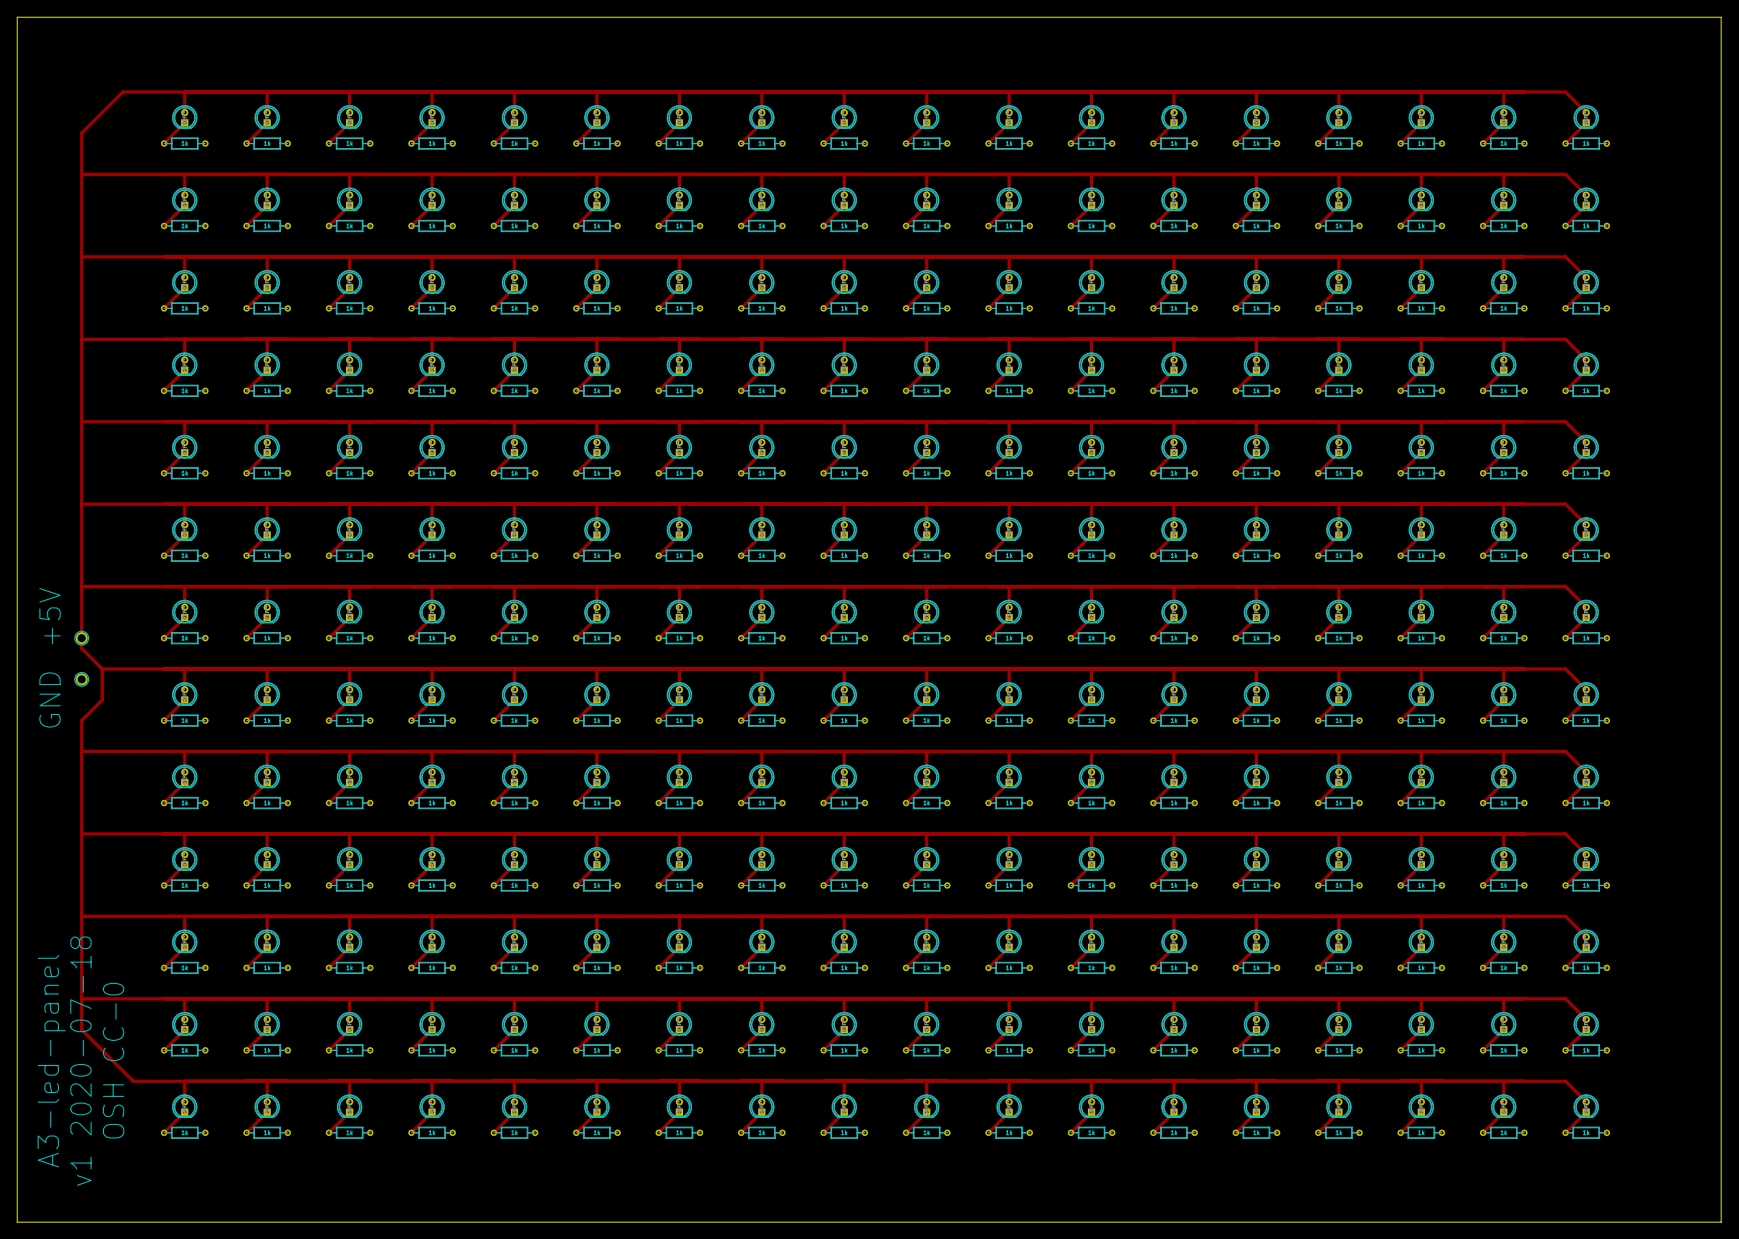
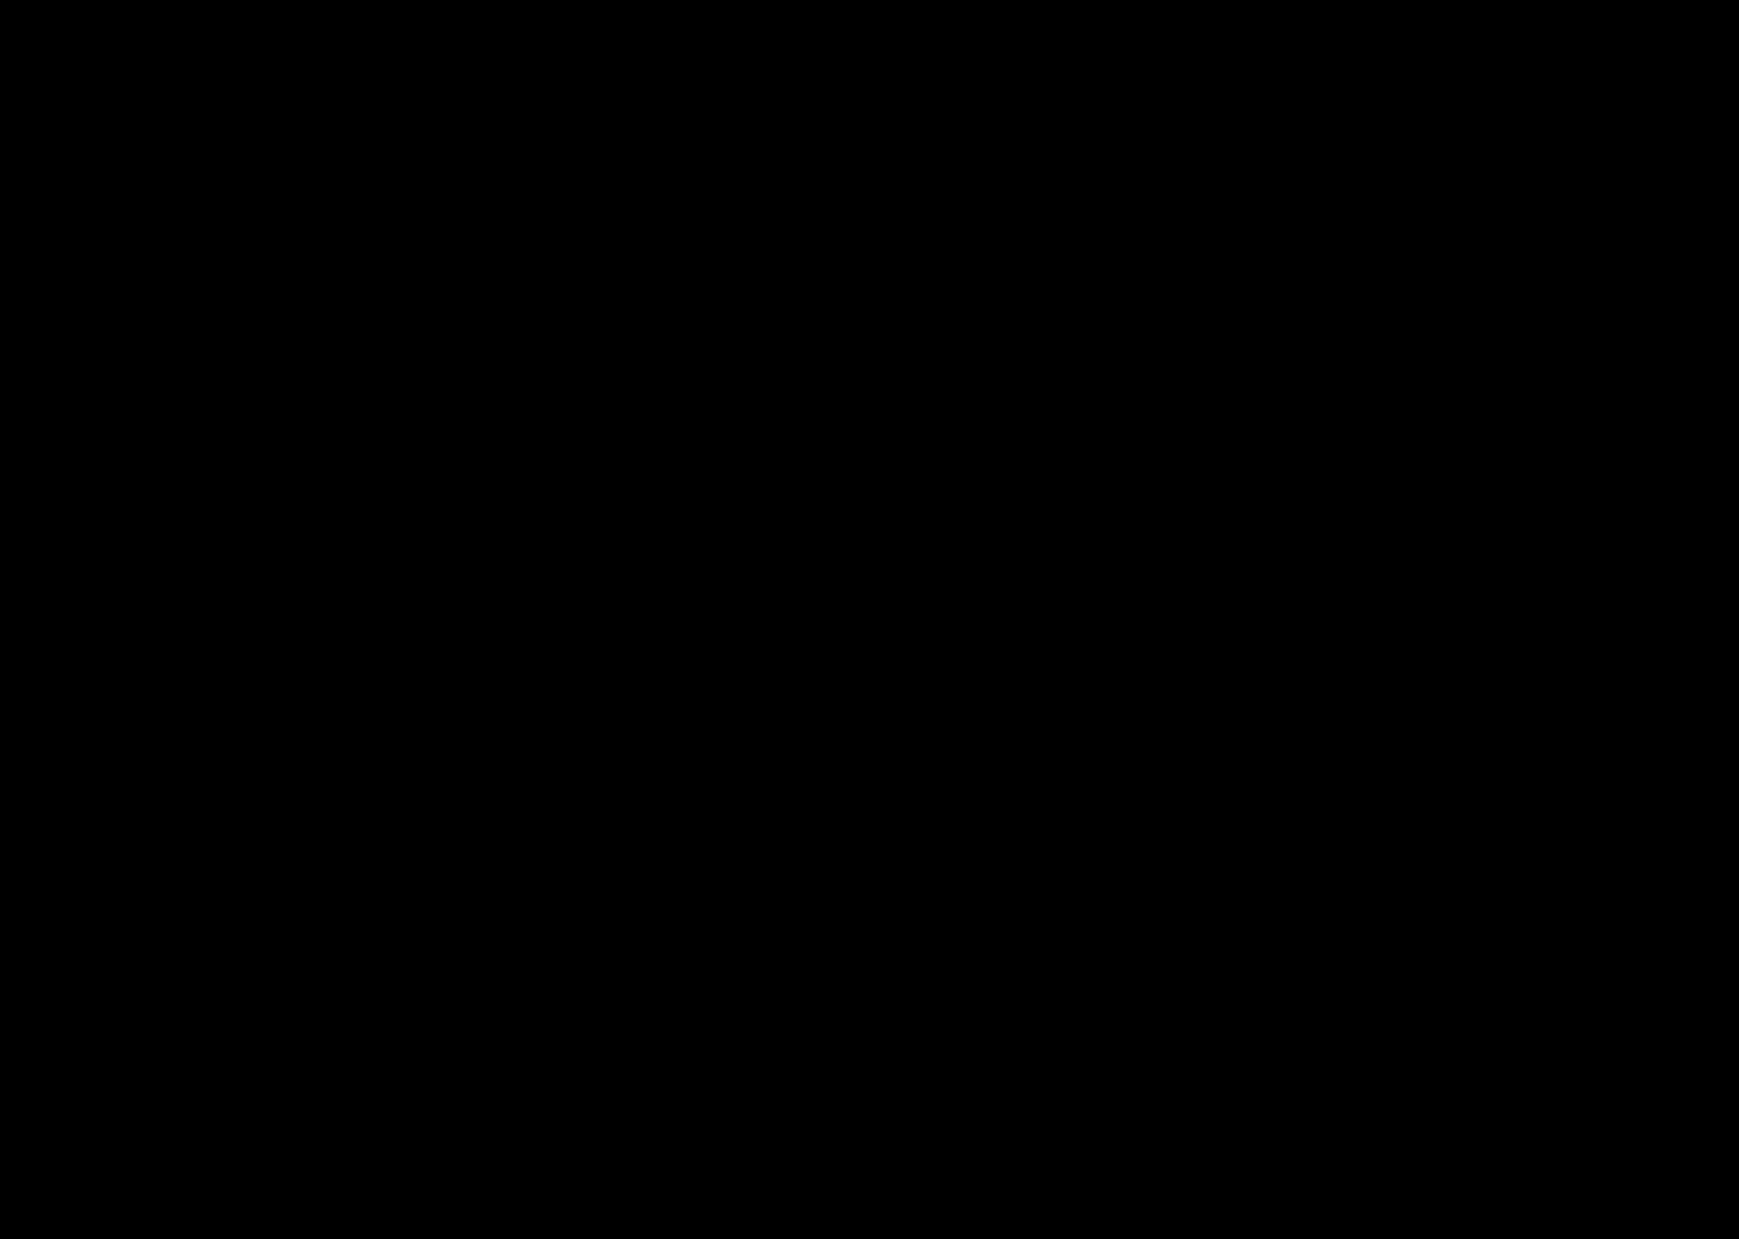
board edge: (17, 17) (17, 1222) (1721, 1222) (1721, 17) (17, 17) -> none
track: (184, 92) (184, 112) -> none
track: (267, 92) (267, 112) -> none
track: (349, 92) (349, 112) -> none
track: (432, 92) (432, 112) -> none
track: (514, 92) (514, 112) -> none
track: (596, 92) (596, 112) -> none
track: (679, 92) (679, 112) -> none
track: (761, 92) (761, 112) -> none
track: (844, 92) (844, 112) -> none
track: (926, 92) (926, 112) -> none
track: (1009, 92) (1009, 112) -> none
track: (1091, 92) (1091, 112) -> none
track: (1174, 92) (1174, 112) -> none
track: (1256, 92) (1256, 112) -> none
track: (1338, 92) (1338, 112) -> none
track: (1421, 92) (1421, 112) -> none
track: (1503, 92) (1503, 112) -> none
track: (1586, 112) (1565, 92) (122, 92) (81, 133) (81, 648) (102, 669) -> none
part: (184, 116) -> none
part: (267, 116) -> none
part: (349, 116) -> none
part: (432, 116) -> none
part: (514, 116) -> none
part: (596, 116) -> none
part: (679, 116) -> none
part: (761, 116) -> none
part: (844, 116) -> none
part: (926, 116) -> none
part: (1009, 116) -> none
part: (1091, 116) -> none
part: (1174, 116) -> none
part: (1256, 116) -> none
part: (1338, 116) -> none
part: (1421, 116) -> none
part: (1503, 116) -> none
part: (1586, 116) -> none
track: (184, 122) (164, 143) -> none
track: (267, 122) (246, 143) -> none
track: (349, 122) (329, 143) -> none
track: (432, 122) (411, 143) -> none
track: (514, 122) (493, 143) -> none
track: (596, 122) (576, 143) -> none
track: (679, 122) (658, 143) -> none
track: (761, 122) (741, 143) -> none
track: (844, 122) (823, 143) -> none
track: (926, 122) (906, 143) -> none
track: (1009, 122) (988, 143) -> none
track: (1091, 122) (1070, 143) -> none
track: (1174, 122) (1153, 143) -> none
track: (1256, 122) (1235, 143) -> none
track: (1338, 122) (1318, 143) -> none
track: (1421, 122) (1400, 143) -> none
track: (1503, 122) (1483, 143) -> none
track: (1586, 122) (1565, 143) -> none
part: (184, 143) -> none
part: (267, 143) -> none
part: (349, 143) -> none
part: (432, 143) -> none
part: (514, 143) -> none
part: (596, 143) -> none
part: (679, 143) -> none
part: (761, 143) -> none
part: (844, 143) -> none
part: (926, 143) -> none
part: (1009, 143) -> none
part: (1091, 143) -> none
part: (1174, 143) -> none
part: (1256, 143) -> none
part: (1338, 143) -> none
part: (1421, 143) -> none
part: (1503, 143) -> none
part: (1586, 143) -> none
track: (81, 174) (1565, 174) (1586, 195) -> none
track: (184, 174) (184, 195) -> none
track: (267, 174) (267, 195) -> none
track: (349, 174) (349, 195) -> none
track: (432, 174) (432, 195) -> none
track: (514, 174) (514, 195) -> none
track: (596, 174) (596, 195) -> none
track: (679, 174) (679, 195) -> none
track: (761, 174) (761, 195) -> none
track: (844, 174) (844, 195) -> none
track: (926, 174) (926, 195) -> none
track: (1009, 174) (1009, 195) -> none
track: (1091, 174) (1091, 195) -> none
track: (1174, 174) (1174, 195) -> none
track: (1256, 174) (1256, 195) -> none
track: (1338, 174) (1338, 195) -> none
track: (1421, 174) (1421, 195) -> none
track: (1503, 174) (1503, 195) -> none
part: (184, 199) -> none
part: (267, 199) -> none
part: (349, 199) -> none
part: (432, 199) -> none
part: (514, 199) -> none
part: (596, 199) -> none
part: (679, 199) -> none
part: (761, 199) -> none
part: (844, 199) -> none
part: (926, 199) -> none
part: (1009, 199) -> none
part: (1091, 199) -> none
part: (1174, 199) -> none
part: (1256, 199) -> none
part: (1338, 199) -> none
part: (1421, 199) -> none
part: (1503, 199) -> none
part: (1586, 199) -> none
track: (184, 205) (164, 225) -> none
track: (267, 205) (246, 225) -> none
track: (349, 205) (329, 225) -> none
track: (432, 205) (411, 225) -> none
track: (514, 205) (493, 225) -> none
track: (596, 205) (576, 225) -> none
track: (679, 205) (658, 225) -> none
track: (761, 205) (741, 225) -> none
track: (844, 205) (823, 225) -> none
track: (926, 205) (906, 225) -> none
track: (1009, 205) (988, 225) -> none
track: (1091, 205) (1070, 225) -> none
track: (1174, 205) (1153, 225) -> none
track: (1256, 205) (1235, 225) -> none
track: (1338, 205) (1318, 225) -> none
track: (1421, 205) (1400, 225) -> none
track: (1503, 205) (1483, 225) -> none
track: (1586, 205) (1565, 225) -> none
part: (184, 225) -> none
part: (267, 225) -> none
part: (349, 225) -> none
part: (432, 225) -> none
part: (514, 225) -> none
part: (596, 225) -> none
part: (679, 225) -> none
part: (761, 225) -> none
part: (844, 225) -> none
part: (926, 225) -> none
part: (1009, 225) -> none
part: (1091, 225) -> none
part: (1174, 225) -> none
part: (1256, 225) -> none
part: (1338, 225) -> none
part: (1421, 225) -> none
part: (1503, 225) -> none
part: (1586, 225) -> none
track: (81, 256) (1565, 256) (1586, 277) -> none
track: (184, 256) (184, 277) -> none
track: (267, 256) (267, 277) -> none
track: (349, 256) (349, 277) -> none
track: (432, 256) (432, 277) -> none
track: (514, 256) (514, 277) -> none
track: (596, 256) (596, 277) -> none
track: (679, 256) (679, 277) -> none
track: (761, 256) (761, 277) -> none
track: (844, 256) (844, 277) -> none
track: (926, 256) (926, 277) -> none
track: (1009, 256) (1009, 277) -> none
track: (1091, 256) (1091, 277) -> none
track: (1174, 256) (1174, 277) -> none
track: (1256, 256) (1256, 277) -> none
track: (1338, 256) (1338, 277) -> none
track: (1421, 256) (1421, 277) -> none
track: (1503, 256) (1503, 277) -> none
part: (184, 281) -> none
part: (267, 281) -> none
part: (349, 281) -> none
part: (432, 281) -> none
part: (514, 281) -> none
part: (596, 281) -> none
part: (679, 281) -> none
part: (761, 281) -> none
part: (844, 281) -> none
part: (926, 281) -> none
part: (1009, 281) -> none
part: (1091, 281) -> none
part: (1174, 281) -> none
part: (1256, 281) -> none
part: (1338, 281) -> none
part: (1421, 281) -> none
part: (1503, 281) -> none
part: (1586, 281) -> none
track: (184, 287) (164, 308) -> none
track: (267, 287) (246, 308) -> none
track: (349, 287) (329, 308) -> none
track: (432, 287) (411, 308) -> none
track: (514, 287) (493, 308) -> none
track: (596, 287) (576, 308) -> none
track: (679, 287) (658, 308) -> none
track: (761, 287) (741, 308) -> none
track: (844, 287) (823, 308) -> none
track: (926, 287) (906, 308) -> none
track: (1009, 287) (988, 308) -> none
track: (1091, 287) (1070, 308) -> none
track: (1174, 287) (1153, 308) -> none
track: (1256, 287) (1235, 308) -> none
track: (1338, 287) (1318, 308) -> none
track: (1421, 287) (1400, 308) -> none
track: (1503, 287) (1483, 308) -> none
track: (1586, 287) (1565, 308) -> none
part: (184, 308) -> none
part: (267, 308) -> none
part: (349, 308) -> none
part: (432, 308) -> none
part: (514, 308) -> none
part: (596, 308) -> none
part: (679, 308) -> none
part: (761, 308) -> none
part: (844, 308) -> none
part: (926, 308) -> none
part: (1009, 308) -> none
part: (1091, 308) -> none
part: (1174, 308) -> none
part: (1256, 308) -> none
part: (1338, 308) -> none
part: (1421, 308) -> none
part: (1503, 308) -> none
part: (1586, 308) -> none
track: (81, 339) (1565, 339) (1586, 359) -> none
track: (184, 339) (184, 359) -> none
track: (267, 339) (267, 359) -> none
track: (349, 339) (349, 359) -> none
track: (432, 339) (432, 359) -> none
track: (514, 339) (514, 359) -> none
track: (596, 339) (596, 359) -> none
track: (679, 339) (679, 359) -> none
track: (761, 339) (761, 359) -> none
track: (844, 339) (844, 359) -> none
track: (926, 339) (926, 359) -> none
track: (1009, 339) (1009, 359) -> none
track: (1091, 339) (1091, 359) -> none
track: (1174, 339) (1174, 359) -> none
track: (1256, 339) (1256, 359) -> none
track: (1338, 339) (1338, 359) -> none
track: (1421, 339) (1421, 359) -> none
track: (1503, 339) (1503, 359) -> none
part: (184, 364) -> none
part: (267, 364) -> none
part: (349, 364) -> none
part: (432, 364) -> none
part: (514, 364) -> none
part: (596, 364) -> none
part: (679, 364) -> none
part: (761, 364) -> none
part: (844, 364) -> none
part: (926, 364) -> none
part: (1009, 364) -> none
part: (1091, 364) -> none
part: (1174, 364) -> none
part: (1256, 364) -> none
part: (1338, 364) -> none
part: (1421, 364) -> none
part: (1503, 364) -> none
part: (1586, 364) -> none
track: (184, 370) (164, 390) -> none
track: (267, 370) (246, 390) -> none
track: (349, 370) (329, 390) -> none
track: (432, 370) (411, 390) -> none
track: (514, 370) (493, 390) -> none
track: (596, 370) (576, 390) -> none
track: (679, 370) (658, 390) -> none
track: (761, 370) (741, 390) -> none
track: (844, 370) (823, 390) -> none
track: (926, 370) (906, 390) -> none
track: (1009, 370) (988, 390) -> none
track: (1091, 370) (1070, 390) -> none
track: (1174, 370) (1153, 390) -> none
track: (1256, 370) (1235, 390) -> none
track: (1338, 370) (1318, 390) -> none
track: (1421, 370) (1400, 390) -> none
track: (1503, 370) (1483, 390) -> none
track: (1586, 370) (1565, 390) -> none
part: (184, 390) -> none
part: (267, 390) -> none
part: (349, 390) -> none
part: (432, 390) -> none
part: (514, 390) -> none
part: (596, 390) -> none
part: (679, 390) -> none
part: (761, 390) -> none
part: (844, 390) -> none
part: (926, 390) -> none
part: (1009, 390) -> none
part: (1091, 390) -> none
part: (1174, 390) -> none
part: (1256, 390) -> none
part: (1338, 390) -> none
part: (1421, 390) -> none
part: (1503, 390) -> none
part: (1586, 390) -> none
track: (81, 421) (1565, 421) (1586, 442) -> none
track: (184, 421) (184, 442) -> none
track: (267, 421) (267, 442) -> none
track: (349, 421) (349, 442) -> none
track: (432, 421) (432, 442) -> none
track: (514, 421) (514, 442) -> none
track: (596, 421) (596, 442) -> none
track: (679, 421) (679, 442) -> none
track: (761, 421) (761, 442) -> none
track: (844, 421) (844, 442) -> none
track: (926, 421) (926, 442) -> none
track: (1009, 421) (1009, 442) -> none
track: (1091, 421) (1091, 442) -> none
track: (1174, 421) (1174, 442) -> none
track: (1256, 421) (1256, 442) -> none
track: (1338, 421) (1338, 442) -> none
track: (1421, 421) (1421, 442) -> none
track: (1503, 421) (1503, 442) -> none
part: (184, 446) -> none
part: (267, 446) -> none
part: (349, 446) -> none
part: (432, 446) -> none
part: (514, 446) -> none
part: (596, 446) -> none
part: (679, 446) -> none
part: (761, 446) -> none
part: (844, 446) -> none
part: (926, 446) -> none
part: (1009, 446) -> none
part: (1091, 446) -> none
part: (1174, 446) -> none
part: (1256, 446) -> none
part: (1338, 446) -> none
part: (1421, 446) -> none
part: (1503, 446) -> none
part: (1586, 446) -> none
track: (184, 452) (164, 473) -> none
track: (267, 452) (246, 473) -> none
track: (349, 452) (329, 473) -> none
track: (432, 452) (411, 473) -> none
track: (514, 452) (493, 473) -> none
track: (596, 452) (576, 473) -> none
track: (679, 452) (658, 473) -> none
track: (761, 452) (741, 473) -> none
track: (844, 452) (823, 473) -> none
track: (926, 452) (906, 473) -> none
track: (1009, 452) (988, 473) -> none
track: (1091, 452) (1070, 473) -> none
track: (1174, 452) (1153, 473) -> none
track: (1256, 452) (1235, 473) -> none
track: (1338, 452) (1318, 473) -> none
track: (1421, 452) (1400, 473) -> none
track: (1503, 452) (1483, 473) -> none
track: (1586, 452) (1565, 473) -> none
part: (184, 473) -> none
part: (267, 473) -> none
part: (349, 473) -> none
part: (432, 473) -> none
part: (514, 473) -> none
part: (596, 473) -> none
part: (679, 473) -> none
part: (761, 473) -> none
part: (844, 473) -> none
part: (926, 473) -> none
part: (1009, 473) -> none
part: (1091, 473) -> none
part: (1174, 473) -> none
part: (1256, 473) -> none
part: (1338, 473) -> none
part: (1421, 473) -> none
part: (1503, 473) -> none
part: (1586, 473) -> none
track: (81, 504) (1565, 504) (1586, 524) -> none
track: (184, 504) (184, 524) -> none
track: (267, 504) (267, 524) -> none
track: (349, 504) (349, 524) -> none
track: (432, 504) (432, 524) -> none
track: (514, 504) (514, 524) -> none
track: (596, 504) (596, 524) -> none
track: (679, 504) (679, 524) -> none
track: (761, 504) (761, 524) -> none
track: (844, 504) (844, 524) -> none
track: (926, 504) (926, 524) -> none
track: (1009, 504) (1009, 524) -> none
track: (1091, 504) (1091, 524) -> none
track: (1174, 504) (1174, 524) -> none
track: (1256, 504) (1256, 524) -> none
track: (1338, 504) (1338, 524) -> none
track: (1421, 504) (1421, 524) -> none
track: (1503, 504) (1503, 524) -> none
part: (184, 529) -> none
part: (267, 529) -> none
part: (349, 529) -> none
part: (432, 529) -> none
part: (514, 529) -> none
part: (596, 529) -> none
part: (679, 529) -> none
part: (761, 529) -> none
part: (844, 529) -> none
part: (926, 529) -> none
part: (1009, 529) -> none
part: (1091, 529) -> none
part: (1174, 529) -> none
part: (1256, 529) -> none
part: (1338, 529) -> none
part: (1421, 529) -> none
part: (1503, 529) -> none
part: (1586, 529) -> none
track: (184, 535) (164, 555) -> none
track: (267, 535) (246, 555) -> none
track: (349, 535) (329, 555) -> none
track: (432, 535) (411, 555) -> none
track: (514, 535) (493, 555) -> none
track: (596, 535) (576, 555) -> none
track: (679, 535) (658, 555) -> none
track: (761, 535) (741, 555) -> none
track: (844, 535) (823, 555) -> none
track: (926, 535) (906, 555) -> none
track: (1009, 535) (988, 555) -> none
track: (1091, 535) (1070, 555) -> none
track: (1174, 535) (1153, 555) -> none
track: (1256, 535) (1235, 555) -> none
track: (1338, 535) (1318, 555) -> none
track: (1421, 535) (1400, 555) -> none
track: (1503, 535) (1483, 555) -> none
track: (1586, 535) (1565, 555) -> none
part: (184, 555) -> none
part: (267, 555) -> none
part: (349, 555) -> none
part: (432, 555) -> none
part: (514, 555) -> none
part: (596, 555) -> none
part: (679, 555) -> none
part: (761, 555) -> none
part: (844, 555) -> none
part: (926, 555) -> none
part: (1009, 555) -> none
part: (1091, 555) -> none
part: (1174, 555) -> none
part: (1256, 555) -> none
part: (1338, 555) -> none
part: (1421, 555) -> none
part: (1503, 555) -> none
part: (1586, 555) -> none
track: (81, 586) (1565, 586) (1586, 607) -> none
track: (184, 586) (184, 607) -> none
track: (267, 586) (267, 607) -> none
track: (349, 586) (349, 607) -> none
track: (432, 586) (432, 607) -> none
track: (514, 586) (514, 607) -> none
track: (596, 586) (596, 607) -> none
track: (679, 586) (679, 607) -> none
track: (761, 586) (761, 607) -> none
track: (844, 586) (844, 607) -> none
track: (926, 586) (926, 607) -> none
track: (1009, 586) (1009, 607) -> none
track: (1091, 586) (1091, 607) -> none
track: (1174, 586) (1174, 607) -> none
track: (1256, 586) (1256, 607) -> none
track: (1338, 586) (1338, 607) -> none
track: (1421, 586) (1421, 607) -> none
track: (1503, 586) (1503, 607) -> none
part: (184, 611) -> none
part: (267, 611) -> none
part: (349, 611) -> none
part: (432, 611) -> none
part: (514, 611) -> none
part: (596, 611) -> none
part: (679, 611) -> none
part: (761, 611) -> none
part: (844, 611) -> none
part: (926, 611) -> none
part: (1009, 611) -> none
part: (1091, 611) -> none
part: (1174, 611) -> none
part: (1256, 611) -> none
part: (1338, 611) -> none
part: (1421, 611) -> none
part: (1503, 611) -> none
part: (1586, 611) -> none
track: (184, 617) (164, 638) -> none
track: (267, 617) (246, 638) -> none
track: (349, 617) (329, 638) -> none
track: (432, 617) (411, 638) -> none
track: (514, 617) (493, 638) -> none
track: (596, 617) (576, 638) -> none
track: (679, 617) (658, 638) -> none
track: (761, 617) (741, 638) -> none
track: (844, 617) (823, 638) -> none
track: (926, 617) (906, 638) -> none
track: (1009, 617) (988, 638) -> none
track: (1091, 617) (1070, 638) -> none
track: (1174, 617) (1153, 638) -> none
track: (1256, 617) (1235, 638) -> none
track: (1338, 617) (1318, 638) -> none
track: (1421, 617) (1400, 638) -> none
track: (1503, 617) (1483, 638) -> none
track: (1586, 617) (1565, 638) -> none
+5V: (81, 638) -> none
part: (184, 638) -> none
part: (267, 638) -> none
part: (349, 638) -> none
part: (432, 638) -> none
part: (514, 638) -> none
part: (596, 638) -> none
part: (679, 638) -> none
part: (761, 638) -> none
part: (844, 638) -> none
part: (926, 638) -> none
part: (1009, 638) -> none
part: (1091, 638) -> none
part: (1174, 638) -> none
part: (1256, 638) -> none
part: (1338, 638) -> none
part: (1421, 638) -> none
part: (1503, 638) -> none
part: (1586, 638) -> none
track: (102, 669) (1565, 669) (1586, 689) -> none
track: (102, 669) (102, 699) (81, 720) (81, 1029) (133, 1081) (1565, 1081) (1586, 1101) -> none
track: (184, 669) (184, 689) -> none
track: (267, 669) (267, 689) -> none
track: (349, 669) (349, 689) -> none
track: (432, 669) (432, 689) -> none
track: (514, 669) (514, 689) -> none
track: (596, 669) (596, 689) -> none
track: (679, 669) (679, 689) -> none
track: (761, 669) (761, 689) -> none
track: (844, 669) (844, 689) -> none
track: (926, 669) (926, 689) -> none
track: (1009, 669) (1009, 689) -> none
track: (1091, 669) (1091, 689) -> none
track: (1174, 669) (1174, 689) -> none
track: (1256, 669) (1256, 689) -> none
track: (1338, 669) (1338, 689) -> none
track: (1421, 669) (1421, 689) -> none
track: (1503, 669) (1503, 689) -> none
GND: (81, 679) -> none
part: (184, 693) -> none
part: (267, 693) -> none
part: (349, 693) -> none
part: (432, 693) -> none
part: (514, 693) -> none
part: (596, 693) -> none
part: (679, 693) -> none
part: (761, 693) -> none
part: (844, 693) -> none
part: (926, 693) -> none
part: (1009, 693) -> none
part: (1091, 693) -> none
part: (1174, 693) -> none
part: (1256, 693) -> none
part: (1338, 693) -> none
part: (1421, 693) -> none
part: (1503, 693) -> none
part: (1586, 693) -> none
track: (184, 699) (164, 720) -> none
track: (267, 699) (246, 720) -> none
track: (349, 699) (329, 720) -> none
track: (432, 699) (411, 720) -> none
track: (514, 699) (493, 720) -> none
track: (596, 699) (576, 720) -> none
track: (679, 699) (658, 720) -> none
track: (761, 699) (741, 720) -> none
track: (844, 699) (823, 720) -> none
track: (926, 699) (906, 720) -> none
track: (1009, 699) (988, 720) -> none
track: (1091, 699) (1070, 720) -> none
track: (1174, 699) (1153, 720) -> none
track: (1256, 699) (1235, 720) -> none
track: (1338, 699) (1318, 720) -> none
track: (1421, 699) (1400, 720) -> none
track: (1503, 699) (1483, 720) -> none
track: (1586, 699) (1565, 720) -> none
part: (184, 720) -> none
part: (267, 720) -> none
part: (349, 720) -> none
part: (432, 720) -> none
part: (514, 720) -> none
part: (596, 720) -> none
part: (679, 720) -> none
part: (761, 720) -> none
part: (844, 720) -> none
part: (926, 720) -> none
part: (1009, 720) -> none
part: (1091, 720) -> none
part: (1174, 720) -> none
part: (1256, 720) -> none
part: (1338, 720) -> none
part: (1421, 720) -> none
part: (1503, 720) -> none
part: (1586, 720) -> none
track: (81, 751) (1565, 751) (1586, 772) -> none
track: (184, 751) (184, 772) -> none
track: (267, 751) (267, 772) -> none
track: (349, 751) (349, 772) -> none
track: (432, 751) (432, 772) -> none
track: (514, 751) (514, 772) -> none
track: (596, 751) (596, 772) -> none
track: (679, 751) (679, 772) -> none
track: (761, 751) (761, 772) -> none
track: (844, 751) (844, 772) -> none
track: (926, 751) (926, 772) -> none
track: (1009, 751) (1009, 772) -> none
track: (1091, 751) (1091, 772) -> none
track: (1174, 751) (1174, 772) -> none
track: (1256, 751) (1256, 772) -> none
track: (1338, 751) (1338, 772) -> none
track: (1421, 751) (1421, 772) -> none
track: (1503, 751) (1503, 772) -> none
part: (184, 776) -> none
part: (267, 776) -> none
part: (349, 776) -> none
part: (432, 776) -> none
part: (514, 776) -> none
part: (596, 776) -> none
part: (679, 776) -> none
part: (761, 776) -> none
part: (844, 776) -> none
part: (926, 776) -> none
part: (1009, 776) -> none
part: (1091, 776) -> none
part: (1174, 776) -> none
part: (1256, 776) -> none
part: (1338, 776) -> none
part: (1421, 776) -> none
part: (1503, 776) -> none
part: (1586, 776) -> none
track: (184, 782) (164, 803) -> none
track: (267, 782) (246, 803) -> none
track: (349, 782) (329, 803) -> none
track: (432, 782) (411, 803) -> none
track: (514, 782) (493, 803) -> none
track: (596, 782) (576, 803) -> none
track: (679, 782) (658, 803) -> none
track: (761, 782) (741, 803) -> none
track: (844, 782) (823, 803) -> none
track: (926, 782) (906, 803) -> none
track: (1009, 782) (988, 803) -> none
track: (1091, 782) (1070, 803) -> none
track: (1174, 782) (1153, 803) -> none
track: (1256, 782) (1235, 803) -> none
track: (1338, 782) (1318, 803) -> none
track: (1421, 782) (1400, 803) -> none
track: (1503, 782) (1483, 803) -> none
track: (1586, 782) (1565, 803) -> none
part: (184, 803) -> none
part: (267, 803) -> none
part: (349, 803) -> none
part: (432, 803) -> none
part: (514, 803) -> none
part: (596, 803) -> none
part: (679, 803) -> none
part: (761, 803) -> none
part: (844, 803) -> none
part: (926, 803) -> none
part: (1009, 803) -> none
part: (1091, 803) -> none
part: (1174, 803) -> none
part: (1256, 803) -> none
part: (1338, 803) -> none
part: (1421, 803) -> none
part: (1503, 803) -> none
part: (1586, 803) -> none
track: (81, 833) (1565, 833) (1586, 854) -> none
track: (184, 833) (184, 854) -> none
track: (267, 833) (267, 854) -> none
track: (349, 833) (349, 854) -> none
track: (432, 833) (432, 854) -> none
track: (514, 833) (514, 854) -> none
track: (596, 833) (596, 854) -> none
track: (679, 833) (679, 854) -> none
track: (761, 833) (761, 854) -> none
track: (844, 833) (844, 854) -> none
track: (926, 833) (926, 854) -> none
track: (1009, 833) (1009, 854) -> none
track: (1091, 833) (1091, 854) -> none
track: (1174, 833) (1174, 854) -> none
track: (1256, 833) (1256, 854) -> none
track: (1338, 833) (1338, 854) -> none
track: (1421, 833) (1421, 854) -> none
track: (1503, 833) (1503, 854) -> none
part: (184, 858) -> none
part: (267, 858) -> none
part: (349, 858) -> none
part: (432, 858) -> none
part: (514, 858) -> none
part: (596, 858) -> none
part: (679, 858) -> none
part: (761, 858) -> none
part: (844, 858) -> none
part: (926, 858) -> none
part: (1009, 858) -> none
part: (1091, 858) -> none
part: (1174, 858) -> none
part: (1256, 858) -> none
part: (1338, 858) -> none
part: (1421, 858) -> none
part: (1503, 858) -> none
part: (1586, 858) -> none
track: (184, 864) (164, 885) -> none
track: (267, 864) (246, 885) -> none
track: (349, 864) (329, 885) -> none
track: (432, 864) (411, 885) -> none
track: (514, 864) (493, 885) -> none
track: (596, 864) (576, 885) -> none
track: (679, 864) (658, 885) -> none
track: (761, 864) (741, 885) -> none
track: (844, 864) (823, 885) -> none
track: (926, 864) (906, 885) -> none
track: (1009, 864) (988, 885) -> none
track: (1091, 864) (1070, 885) -> none
track: (1174, 864) (1153, 885) -> none
track: (1256, 864) (1235, 885) -> none
track: (1338, 864) (1318, 885) -> none
track: (1421, 864) (1400, 885) -> none
track: (1503, 864) (1483, 885) -> none
track: (1586, 864) (1565, 885) -> none
part: (184, 885) -> none
part: (267, 885) -> none
part: (349, 885) -> none
part: (432, 885) -> none
part: (514, 885) -> none
part: (596, 885) -> none
part: (679, 885) -> none
part: (761, 885) -> none
part: (844, 885) -> none
part: (926, 885) -> none
part: (1009, 885) -> none
part: (1091, 885) -> none
part: (1174, 885) -> none
part: (1256, 885) -> none
part: (1338, 885) -> none
part: (1421, 885) -> none
part: (1503, 885) -> none
part: (1586, 885) -> none
track: (81, 916) (1565, 916) (1586, 937) -> none
track: (184, 916) (184, 937) -> none
track: (267, 916) (267, 937) -> none
track: (349, 916) (349, 937) -> none
track: (432, 916) (432, 937) -> none
track: (514, 916) (514, 937) -> none
track: (596, 916) (596, 937) -> none
track: (679, 916) (679, 937) -> none
track: (761, 916) (761, 937) -> none
track: (844, 916) (844, 937) -> none
track: (926, 916) (926, 937) -> none
track: (1009, 916) (1009, 937) -> none
track: (1091, 916) (1091, 937) -> none
track: (1174, 916) (1174, 937) -> none
track: (1256, 916) (1256, 937) -> none
track: (1338, 916) (1338, 937) -> none
track: (1421, 916) (1421, 937) -> none
track: (1503, 916) (1503, 937) -> none
part: (184, 941) -> none
part: (267, 941) -> none
part: (349, 941) -> none
part: (432, 941) -> none
part: (514, 941) -> none
part: (596, 941) -> none
part: (679, 941) -> none
part: (761, 941) -> none
part: (844, 941) -> none
part: (926, 941) -> none
part: (1009, 941) -> none
part: (1091, 941) -> none
part: (1174, 941) -> none
part: (1256, 941) -> none
part: (1338, 941) -> none
part: (1421, 941) -> none
part: (1503, 941) -> none
part: (1586, 941) -> none
track: (184, 947) (164, 967) -> none
track: (267, 947) (246, 967) -> none
track: (349, 947) (329, 967) -> none
track: (432, 947) (411, 967) -> none
track: (514, 947) (493, 967) -> none
track: (596, 947) (576, 967) -> none
track: (679, 947) (658, 967) -> none
track: (761, 947) (741, 967) -> none
track: (844, 947) (823, 967) -> none
track: (926, 947) (906, 967) -> none
track: (1009, 947) (988, 967) -> none
track: (1091, 947) (1070, 967) -> none
track: (1174, 947) (1153, 967) -> none
track: (1256, 947) (1235, 967) -> none
track: (1338, 947) (1318, 967) -> none
track: (1421, 947) (1400, 967) -> none
track: (1503, 947) (1483, 967) -> none
track: (1586, 947) (1565, 967) -> none
part: (184, 967) -> none
part: (267, 967) -> none
part: (349, 967) -> none
part: (432, 967) -> none
part: (514, 967) -> none
part: (596, 967) -> none
part: (679, 967) -> none
part: (761, 967) -> none
part: (844, 967) -> none
part: (926, 967) -> none
part: (1009, 967) -> none
part: (1091, 967) -> none
part: (1174, 967) -> none
part: (1256, 967) -> none
part: (1338, 967) -> none
part: (1421, 967) -> none
part: (1503, 967) -> none
part: (1586, 967) -> none
track: (81, 998) (1565, 998) (1586, 1019) -> none
track: (184, 998) (184, 1019) -> none
track: (267, 998) (267, 1019) -> none
track: (349, 998) (349, 1019) -> none
track: (432, 998) (432, 1019) -> none
track: (514, 998) (514, 1019) -> none
track: (596, 998) (596, 1019) -> none
track: (679, 998) (679, 1019) -> none
track: (761, 998) (761, 1019) -> none
track: (844, 998) (844, 1019) -> none
track: (926, 998) (926, 1019) -> none
track: (1009, 998) (1009, 1019) -> none
track: (1091, 998) (1091, 1019) -> none
track: (1174, 998) (1174, 1019) -> none
track: (1256, 998) (1256, 1019) -> none
track: (1338, 998) (1338, 1019) -> none
track: (1421, 998) (1421, 1019) -> none
track: (1503, 998) (1503, 1019) -> none
part: (184, 1023) -> none
part: (267, 1023) -> none
part: (349, 1023) -> none
part: (432, 1023) -> none
part: (514, 1023) -> none
part: (596, 1023) -> none
part: (679, 1023) -> none
part: (761, 1023) -> none
part: (844, 1023) -> none
part: (926, 1023) -> none
part: (1009, 1023) -> none
part: (1091, 1023) -> none
part: (1174, 1023) -> none
part: (1256, 1023) -> none
part: (1338, 1023) -> none
part: (1421, 1023) -> none
part: (1503, 1023) -> none
part: (1586, 1023) -> none
track: (184, 1029) (164, 1050) -> none
track: (267, 1029) (246, 1050) -> none
track: (349, 1029) (329, 1050) -> none
track: (432, 1029) (411, 1050) -> none
track: (514, 1029) (493, 1050) -> none
track: (596, 1029) (576, 1050) -> none
track: (679, 1029) (658, 1050) -> none
track: (761, 1029) (741, 1050) -> none
track: (844, 1029) (823, 1050) -> none
track: (926, 1029) (906, 1050) -> none
track: (1009, 1029) (988, 1050) -> none
track: (1091, 1029) (1070, 1050) -> none
track: (1174, 1029) (1153, 1050) -> none
track: (1256, 1029) (1235, 1050) -> none
track: (1338, 1029) (1318, 1050) -> none
track: (1421, 1029) (1400, 1050) -> none
track: (1503, 1029) (1483, 1050) -> none
track: (1586, 1029) (1565, 1050) -> none
part: (184, 1050) -> none
part: (267, 1050) -> none
part: (349, 1050) -> none
part: (432, 1050) -> none
part: (514, 1050) -> none
part: (596, 1050) -> none
part: (679, 1050) -> none
part: (761, 1050) -> none
part: (844, 1050) -> none
part: (926, 1050) -> none
part: (1009, 1050) -> none
part: (1091, 1050) -> none
part: (1174, 1050) -> none
part: (1256, 1050) -> none
part: (1338, 1050) -> none
part: (1421, 1050) -> none
part: (1503, 1050) -> none
part: (1586, 1050) -> none
text: OSH CC-0 (113, 1060) -> none
text: A3-led-panel (51, 1061) -> none
text: v1 2020-07-18 (80, 1061) -> none
track: (184, 1081) (184, 1101) -> none
track: (267, 1081) (267, 1101) -> none
track: (349, 1081) (349, 1101) -> none
track: (432, 1081) (432, 1101) -> none
track: (514, 1081) (514, 1101) -> none
track: (596, 1081) (596, 1101) -> none
track: (679, 1081) (679, 1101) -> none
track: (761, 1081) (761, 1101) -> none
track: (844, 1081) (844, 1101) -> none
track: (926, 1081) (926, 1101) -> none
track: (1009, 1081) (1009, 1101) -> none
track: (1091, 1081) (1091, 1101) -> none
track: (1174, 1081) (1174, 1101) -> none
track: (1256, 1081) (1256, 1101) -> none
track: (1338, 1081) (1338, 1101) -> none
track: (1421, 1081) (1421, 1101) -> none
track: (1503, 1081) (1503, 1101) -> none
part: (184, 1106) -> none
part: (267, 1106) -> none
part: (349, 1106) -> none
part: (432, 1106) -> none
part: (514, 1106) -> none
part: (596, 1106) -> none
part: (679, 1106) -> none
part: (761, 1106) -> none
part: (844, 1106) -> none
part: (926, 1106) -> none
part: (1009, 1106) -> none
part: (1091, 1106) -> none
part: (1174, 1106) -> none
part: (1256, 1106) -> none
part: (1338, 1106) -> none
part: (1421, 1106) -> none
part: (1503, 1106) -> none
part: (1586, 1106) -> none
track: (184, 1112) (164, 1132) -> none
track: (267, 1112) (246, 1132) -> none
track: (349, 1112) (329, 1132) -> none
track: (432, 1112) (411, 1132) -> none
track: (514, 1112) (493, 1132) -> none
track: (596, 1112) (576, 1132) -> none
track: (679, 1112) (658, 1132) -> none
track: (761, 1112) (741, 1132) -> none
track: (844, 1112) (823, 1132) -> none
track: (926, 1112) (906, 1132) -> none
track: (1009, 1112) (988, 1132) -> none
track: (1091, 1112) (1070, 1132) -> none
track: (1174, 1112) (1153, 1132) -> none
track: (1256, 1112) (1235, 1132) -> none
track: (1338, 1112) (1318, 1132) -> none
track: (1421, 1112) (1400, 1132) -> none
track: (1503, 1112) (1483, 1132) -> none
track: (1586, 1112) (1565, 1132) -> none
part: (184, 1132) -> none
part: (267, 1132) -> none
part: (349, 1132) -> none
part: (432, 1132) -> none
part: (514, 1132) -> none
part: (596, 1132) -> none
part: (679, 1132) -> none
part: (761, 1132) -> none
part: (844, 1132) -> none
part: (926, 1132) -> none
part: (1009, 1132) -> none
part: (1091, 1132) -> none
part: (1174, 1132) -> none
part: (1256, 1132) -> none
part: (1338, 1132) -> none
part: (1421, 1132) -> none
part: (1503, 1132) -> none
part: (1586, 1132) -> none

